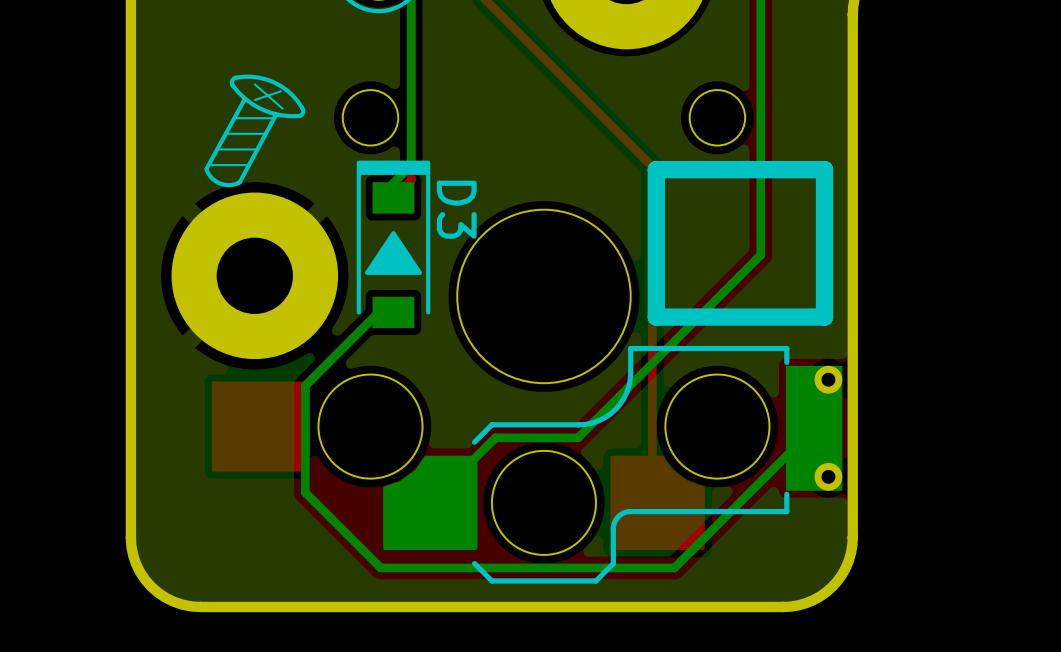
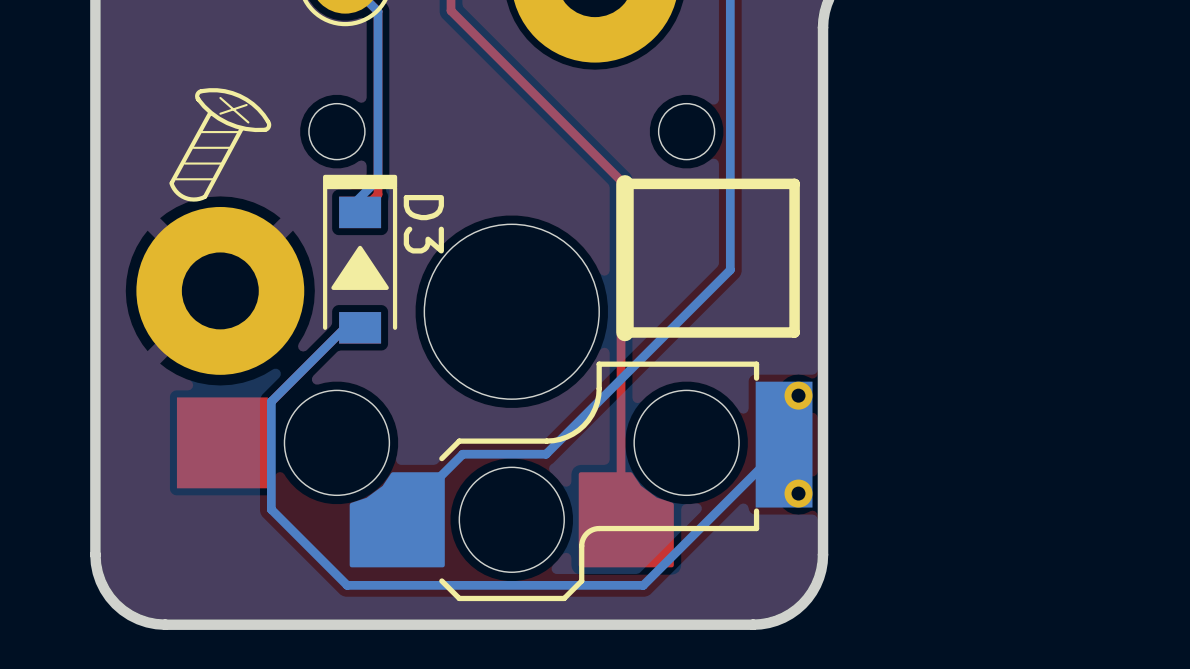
line width: thick (656, 169) (824, 169) (824, 317) (656, 317) -> thin (624, 183) (794, 183) (794, 332) (624, 332)

